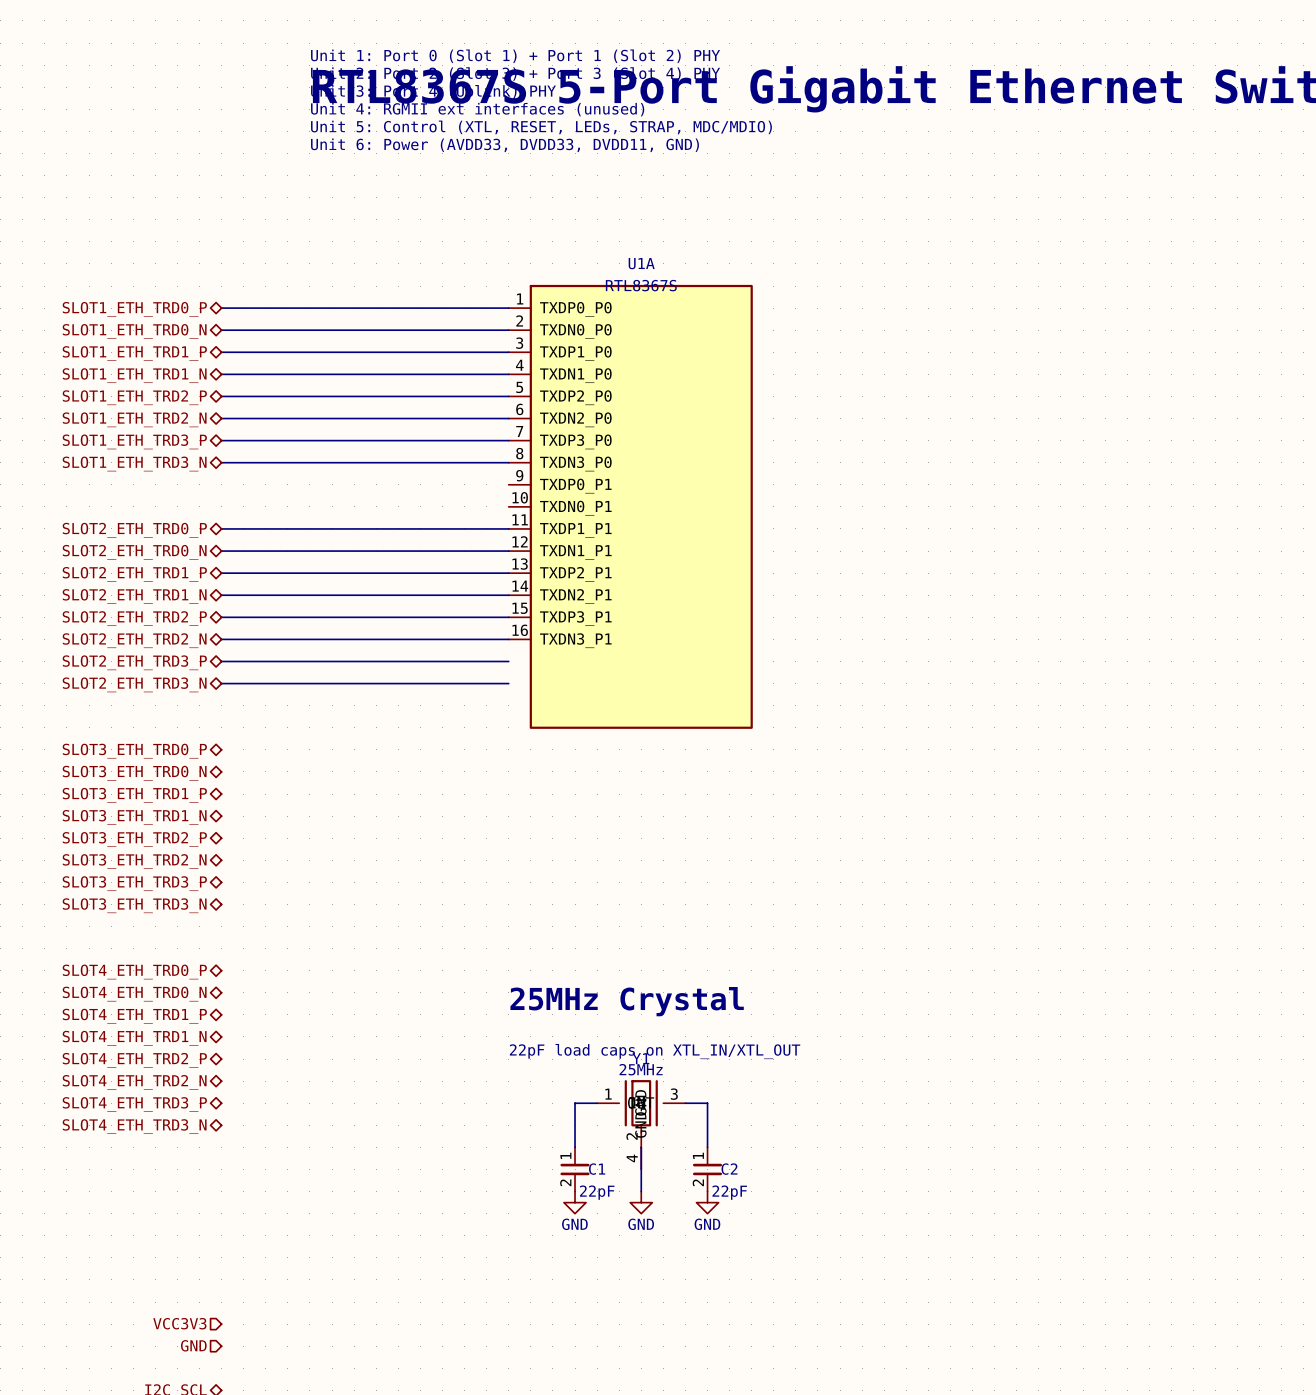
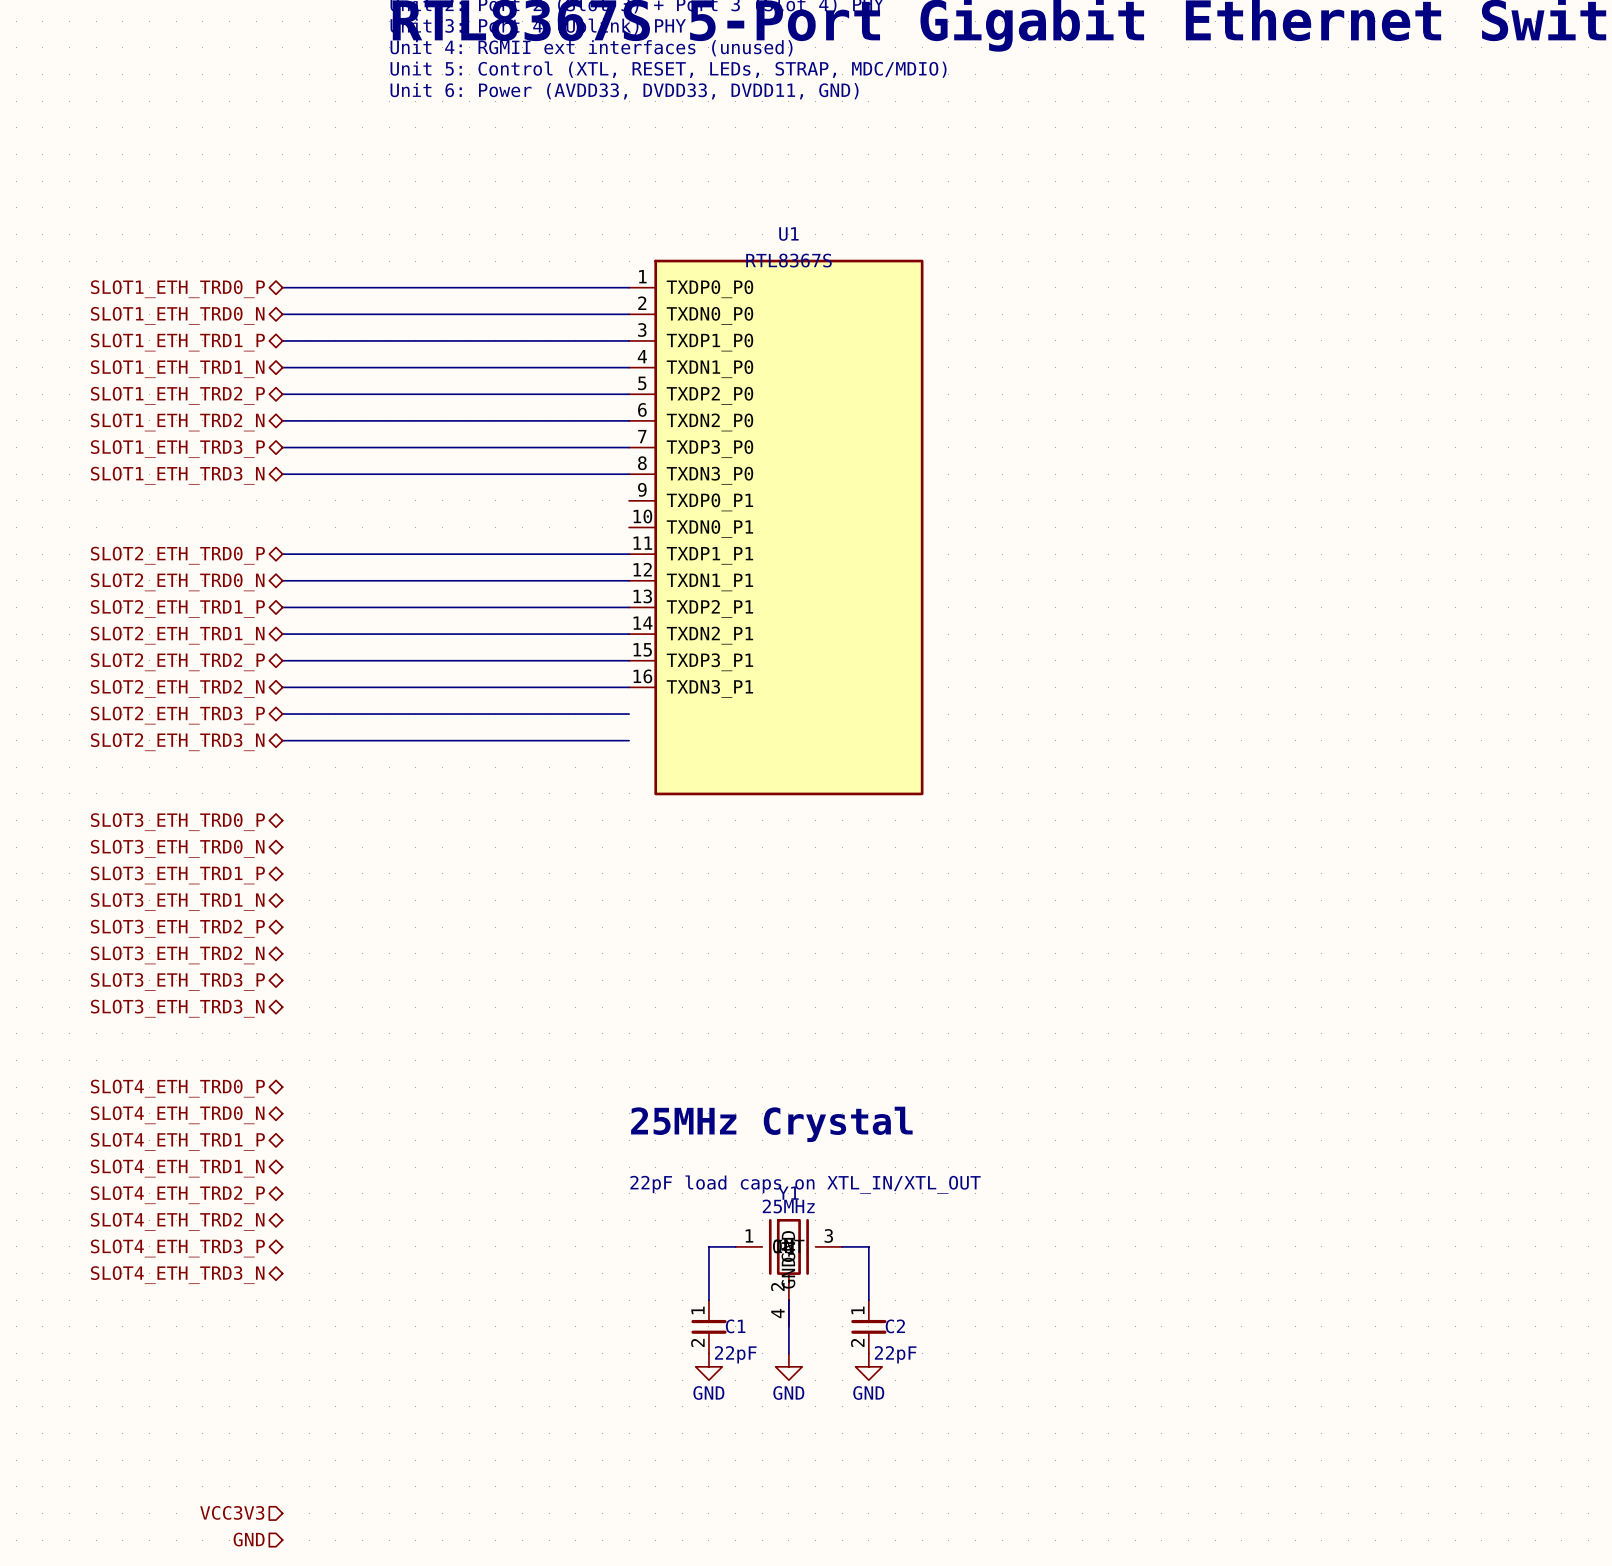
U1A name: U1A (641, 263) -> U1 (788, 234)

